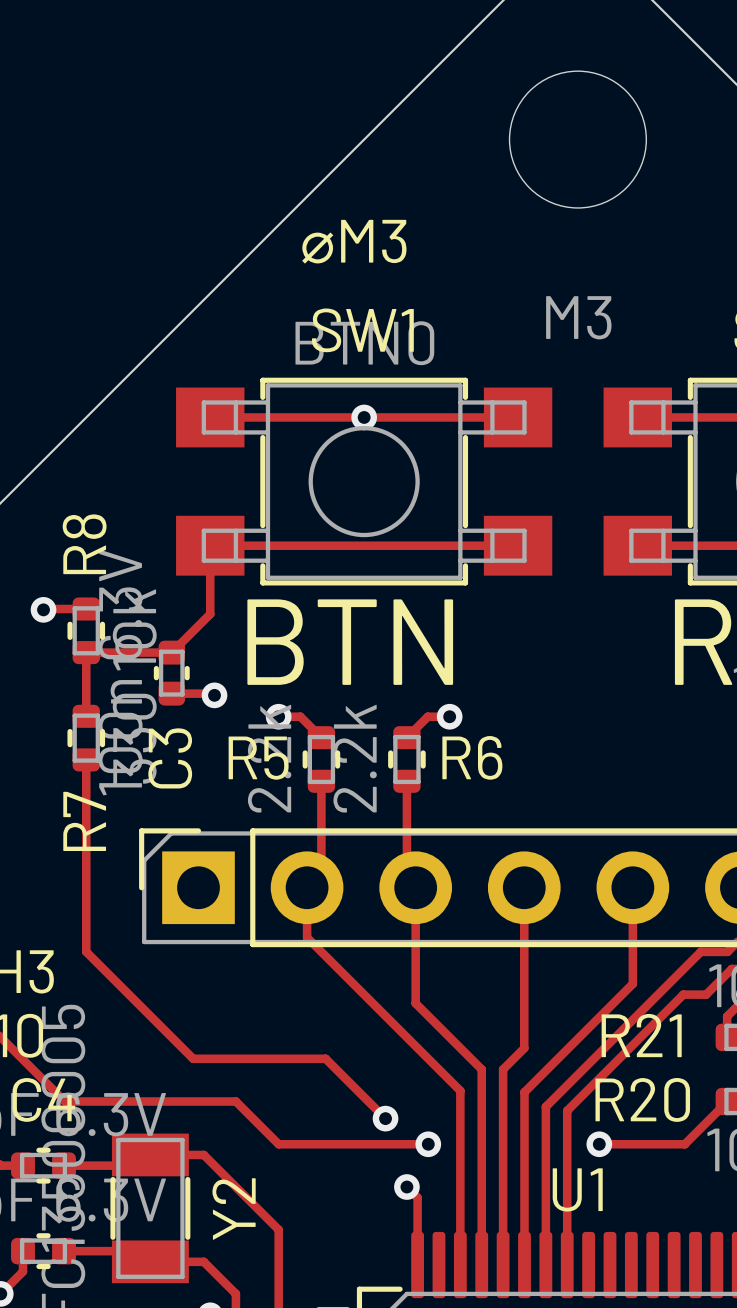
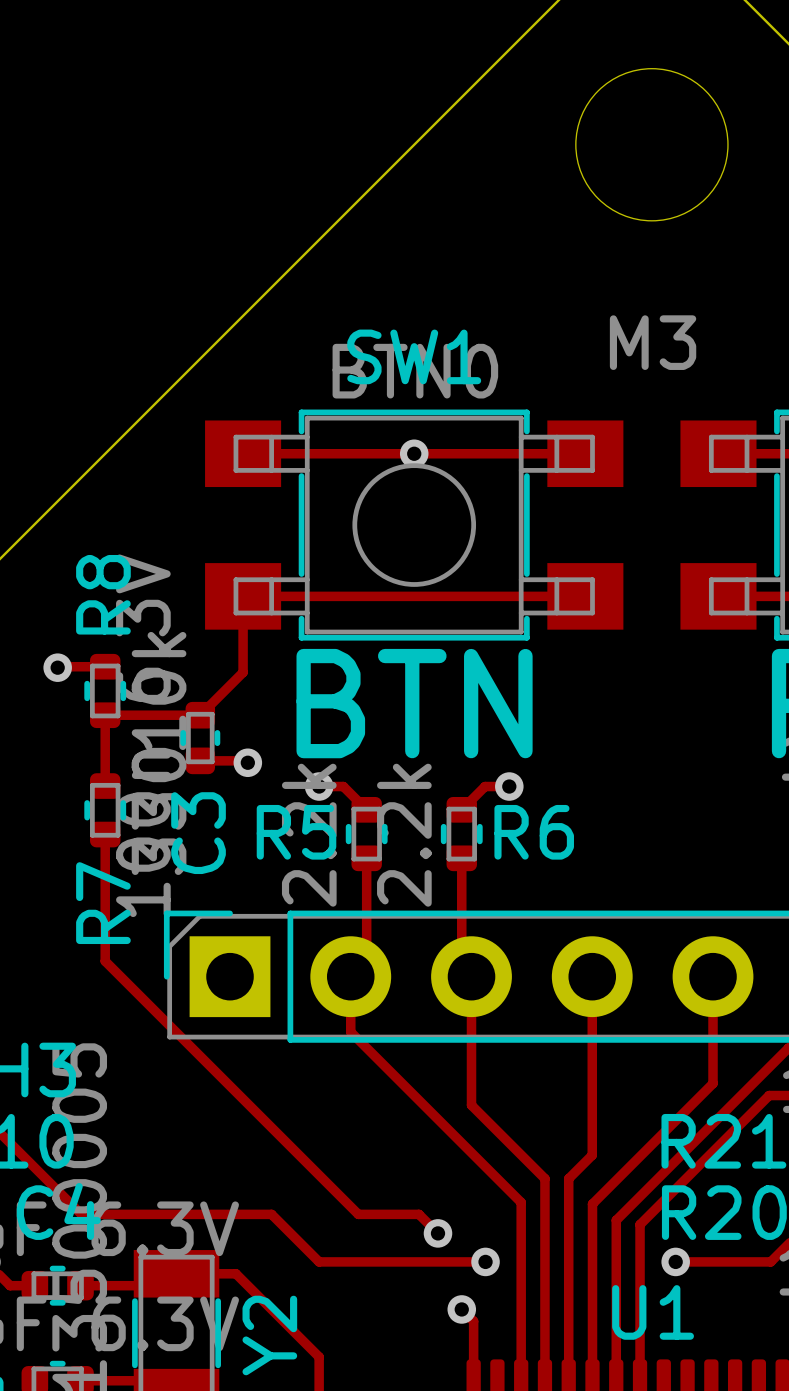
text: ⌀M3 (354, 241) -> none
track: (86, 873) (86, 951) (193, 1058) (325, 1058) (368, 1101) -> (105, 961) (358, 1214) (418, 1214)

